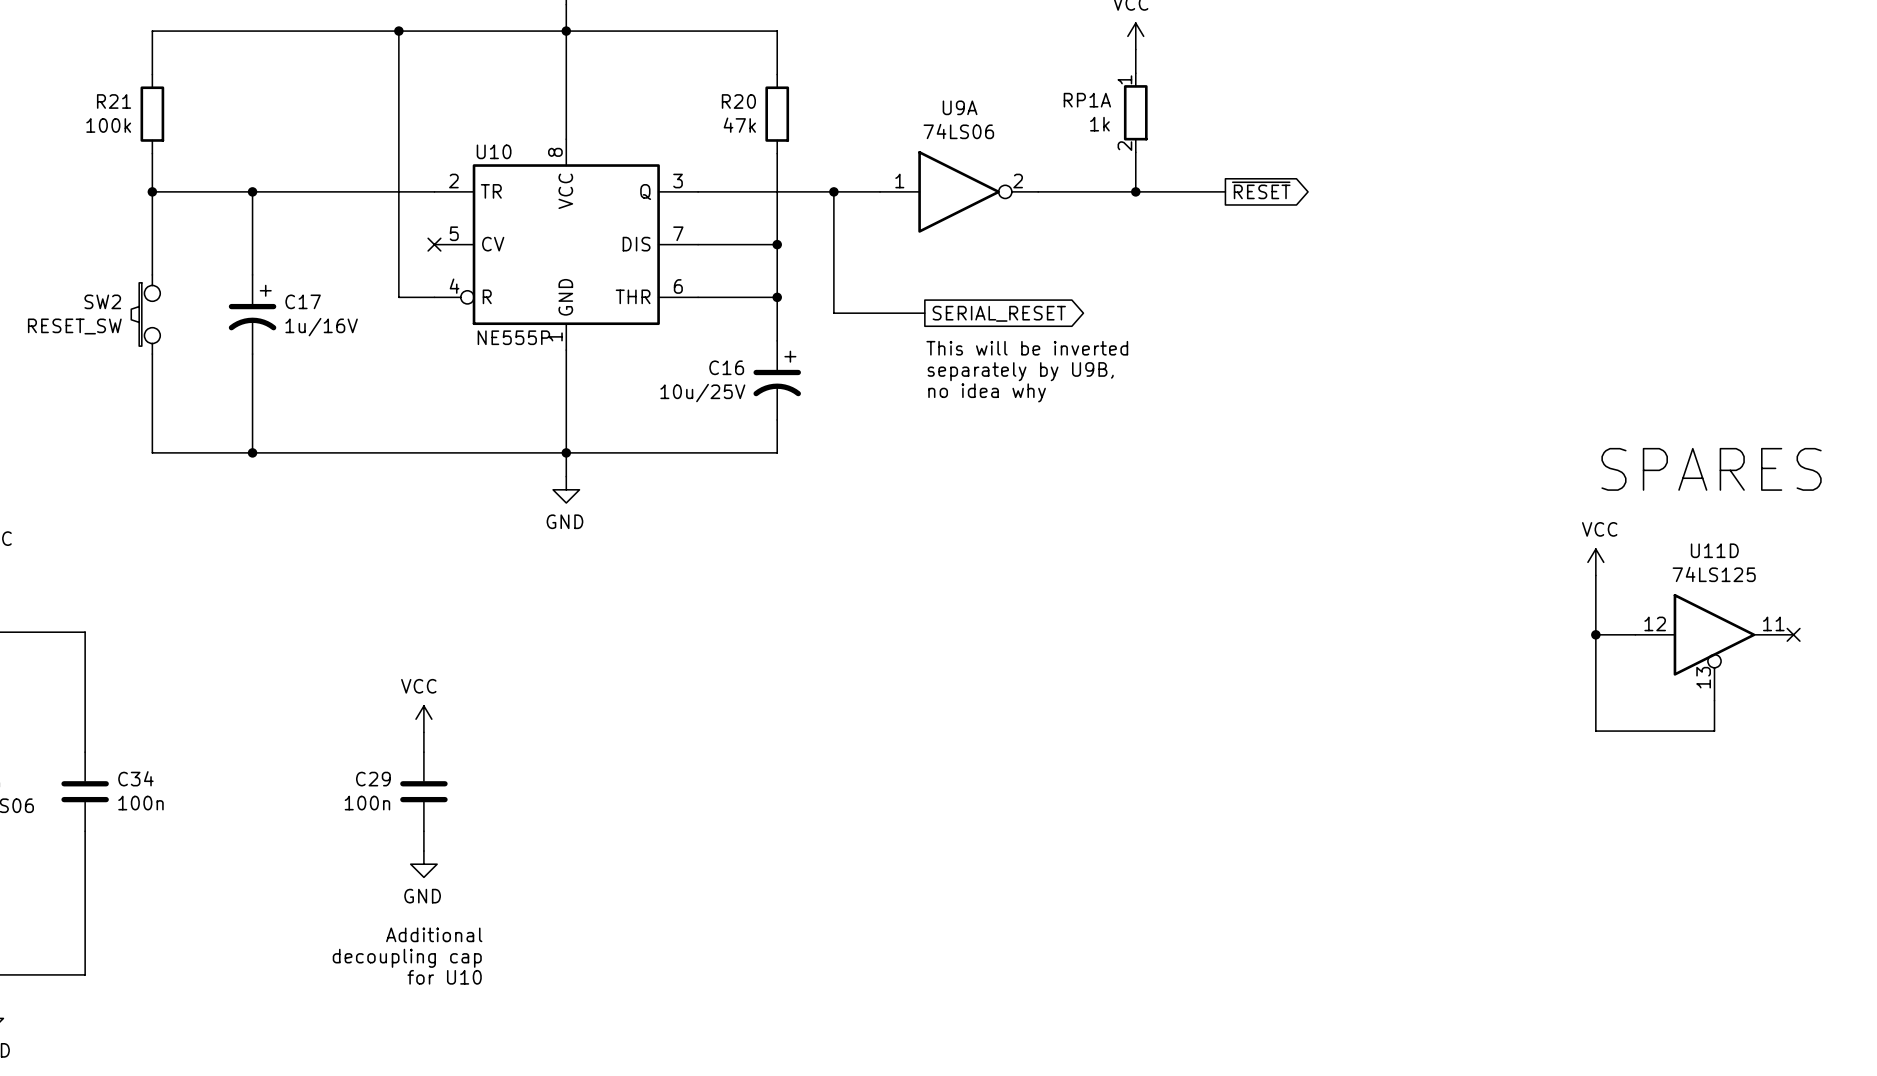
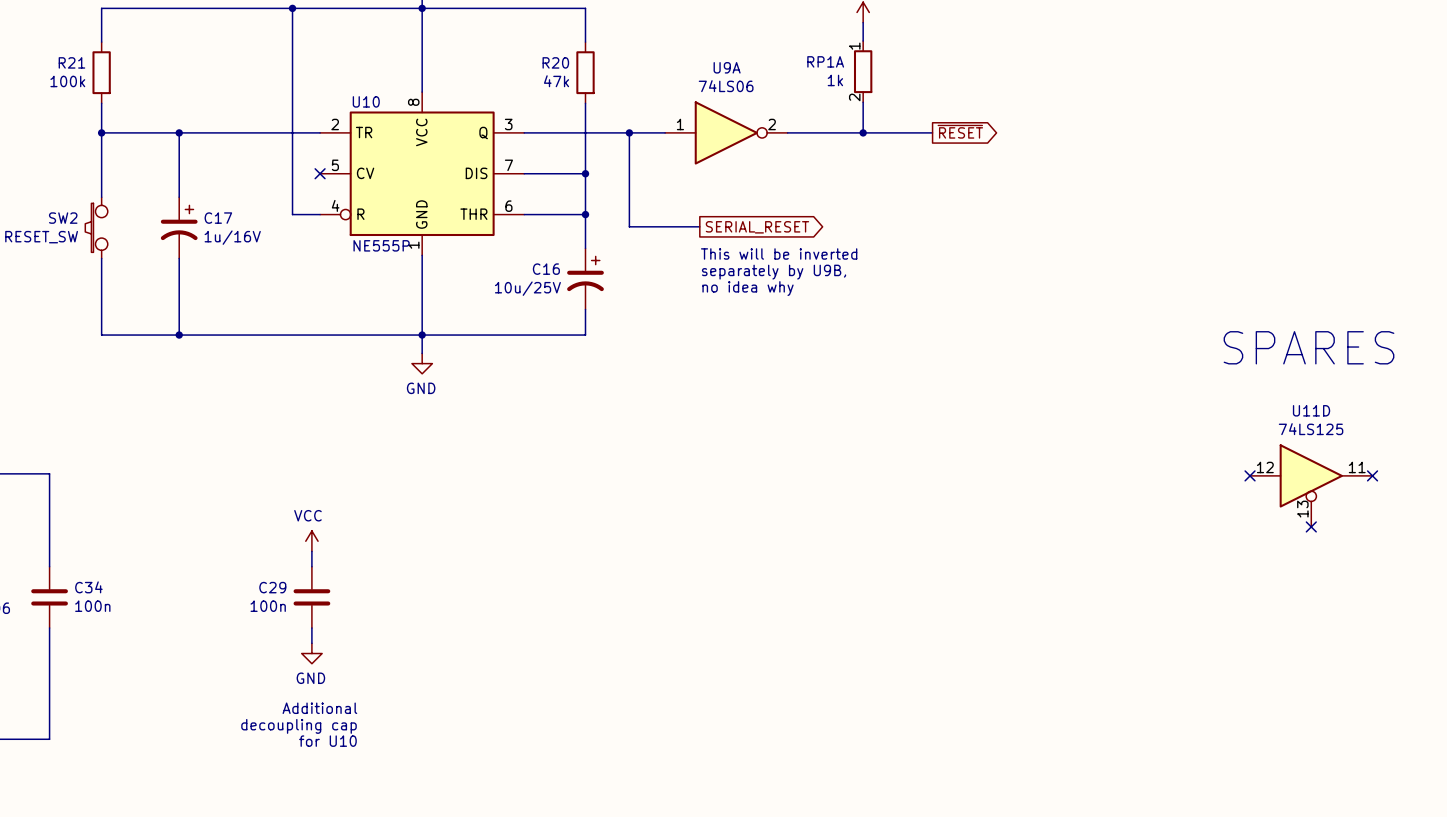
power symbol: VCC (1595, 562) -> none
wire: (1595, 575) (1595, 731) (1714, 731) (1714, 700) -> none
wire: (1595, 634) (1635, 634) -> none
junction: (1595, 634) -> none
no-connect mark: none -> (1250, 475)
no-connect mark: none -> (1311, 526)

